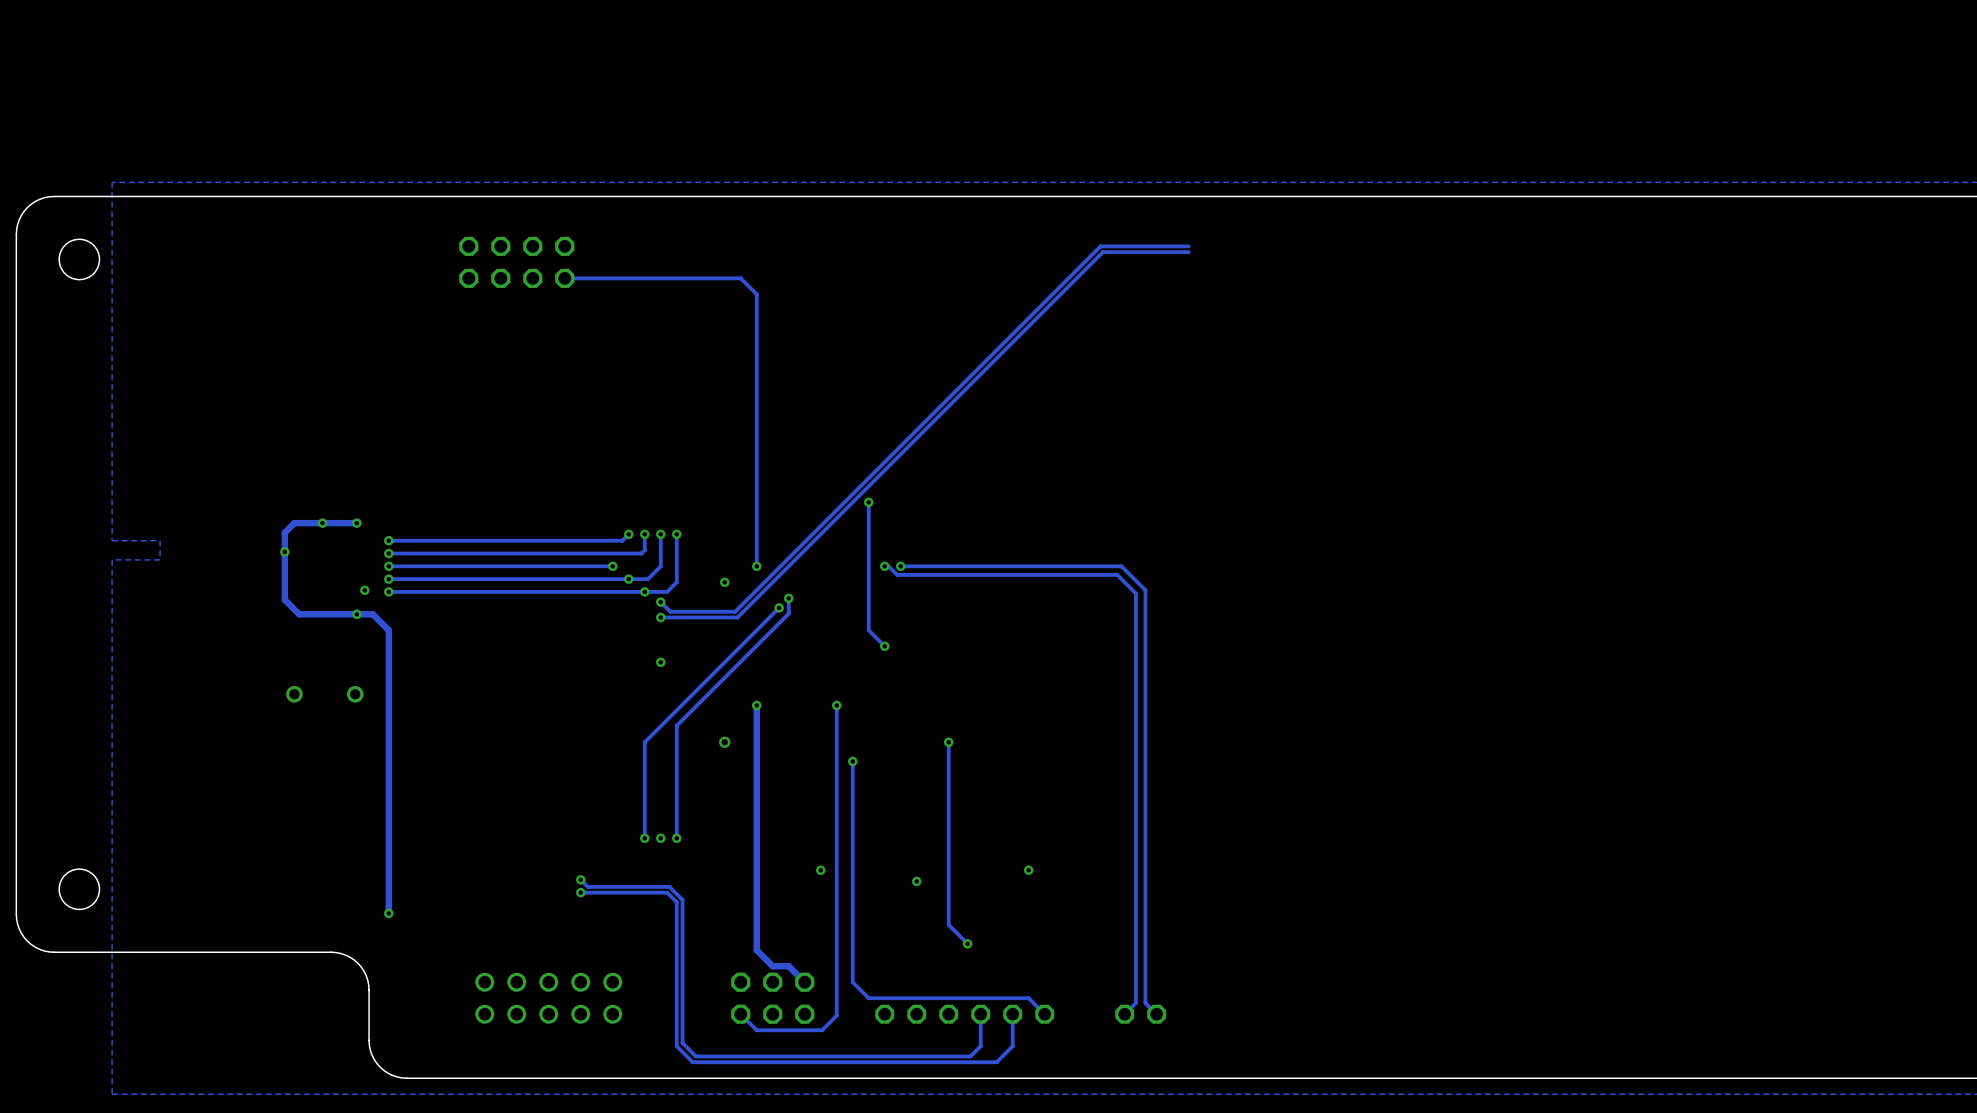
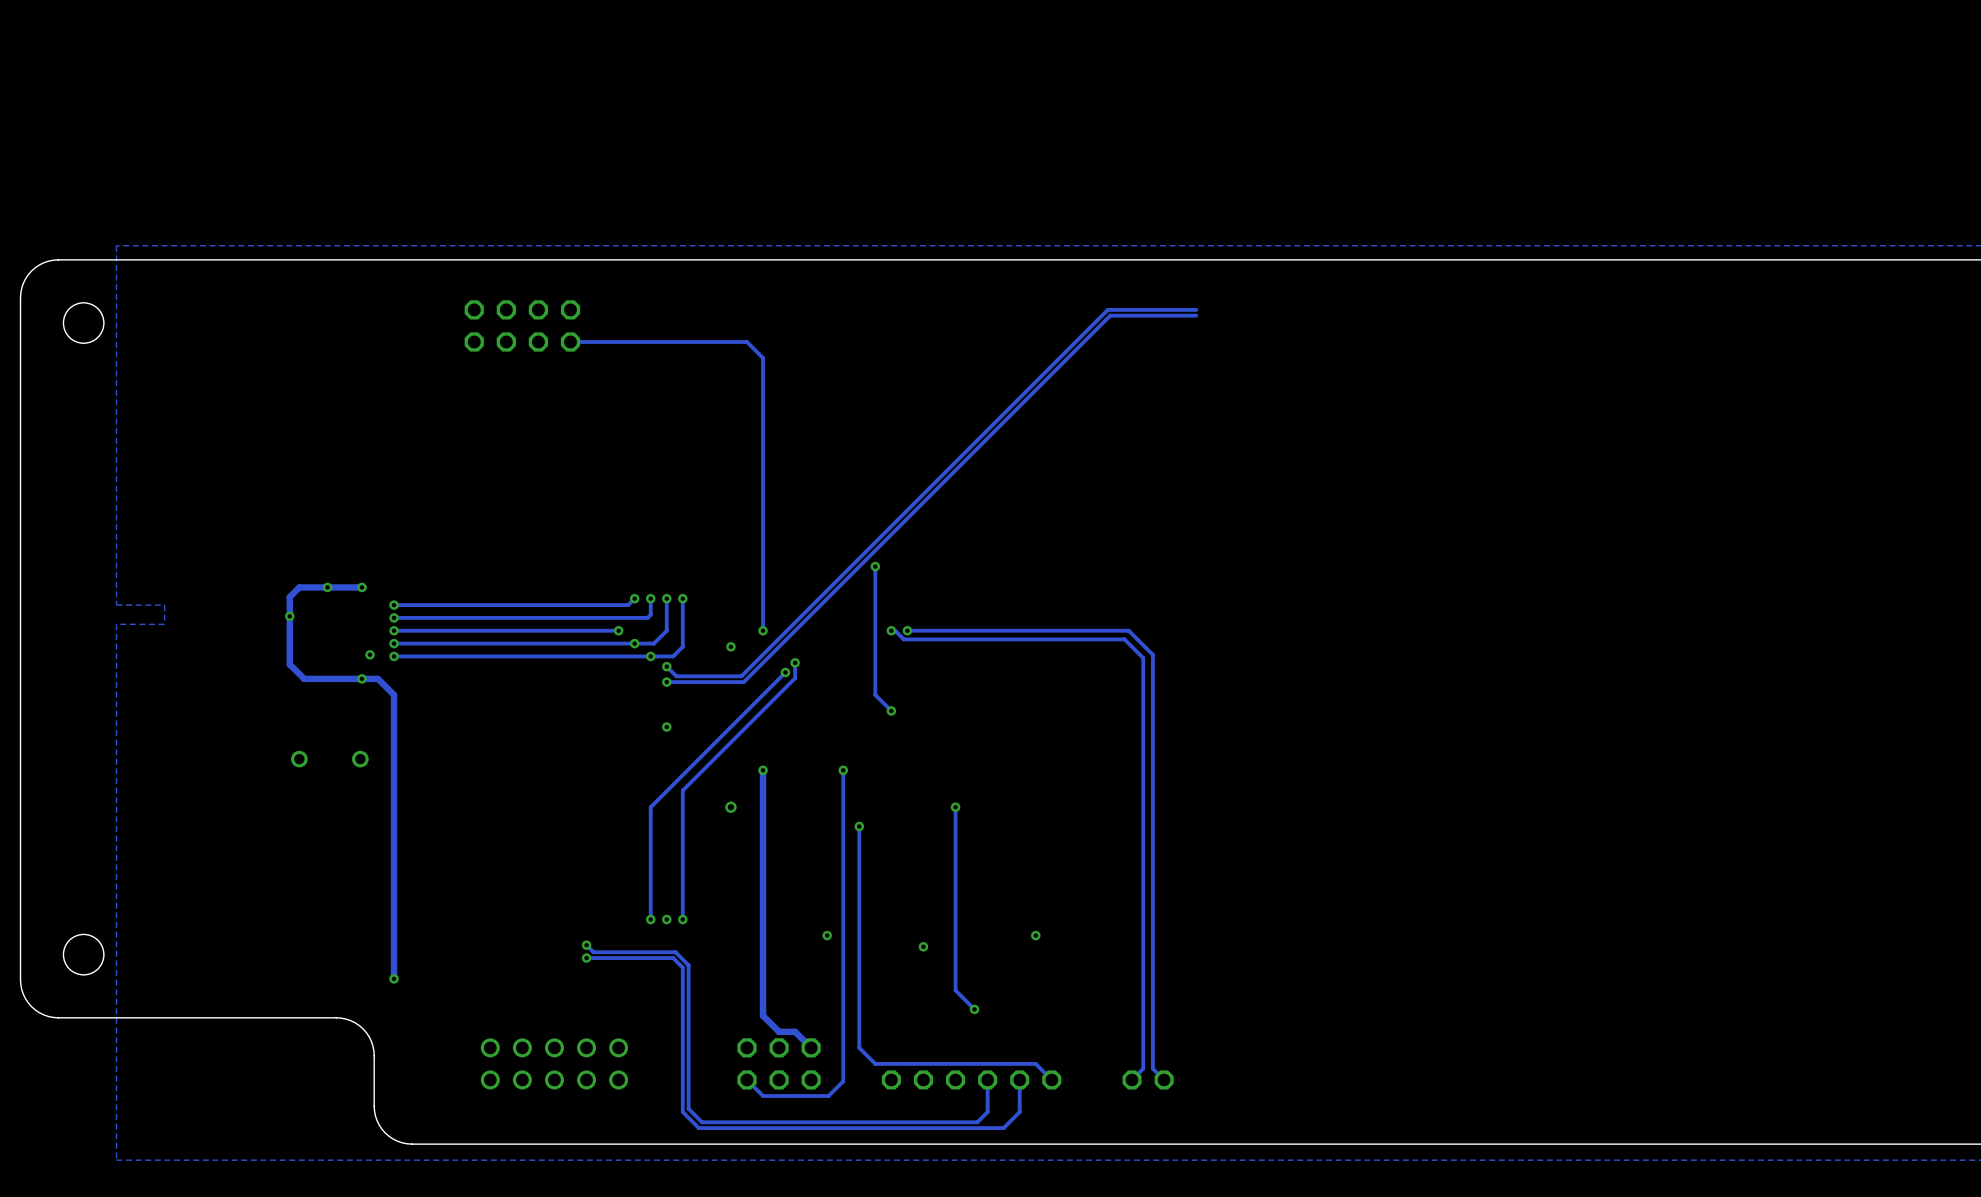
track: none -> (650, 903) (650, 919)
via: (644, 838) -> none
via: (660, 838) -> none
track: none -> (682, 903) (682, 919)
via: (676, 838) -> none
via: none -> (650, 919)
via: none -> (666, 919)
via: none -> (682, 919)

